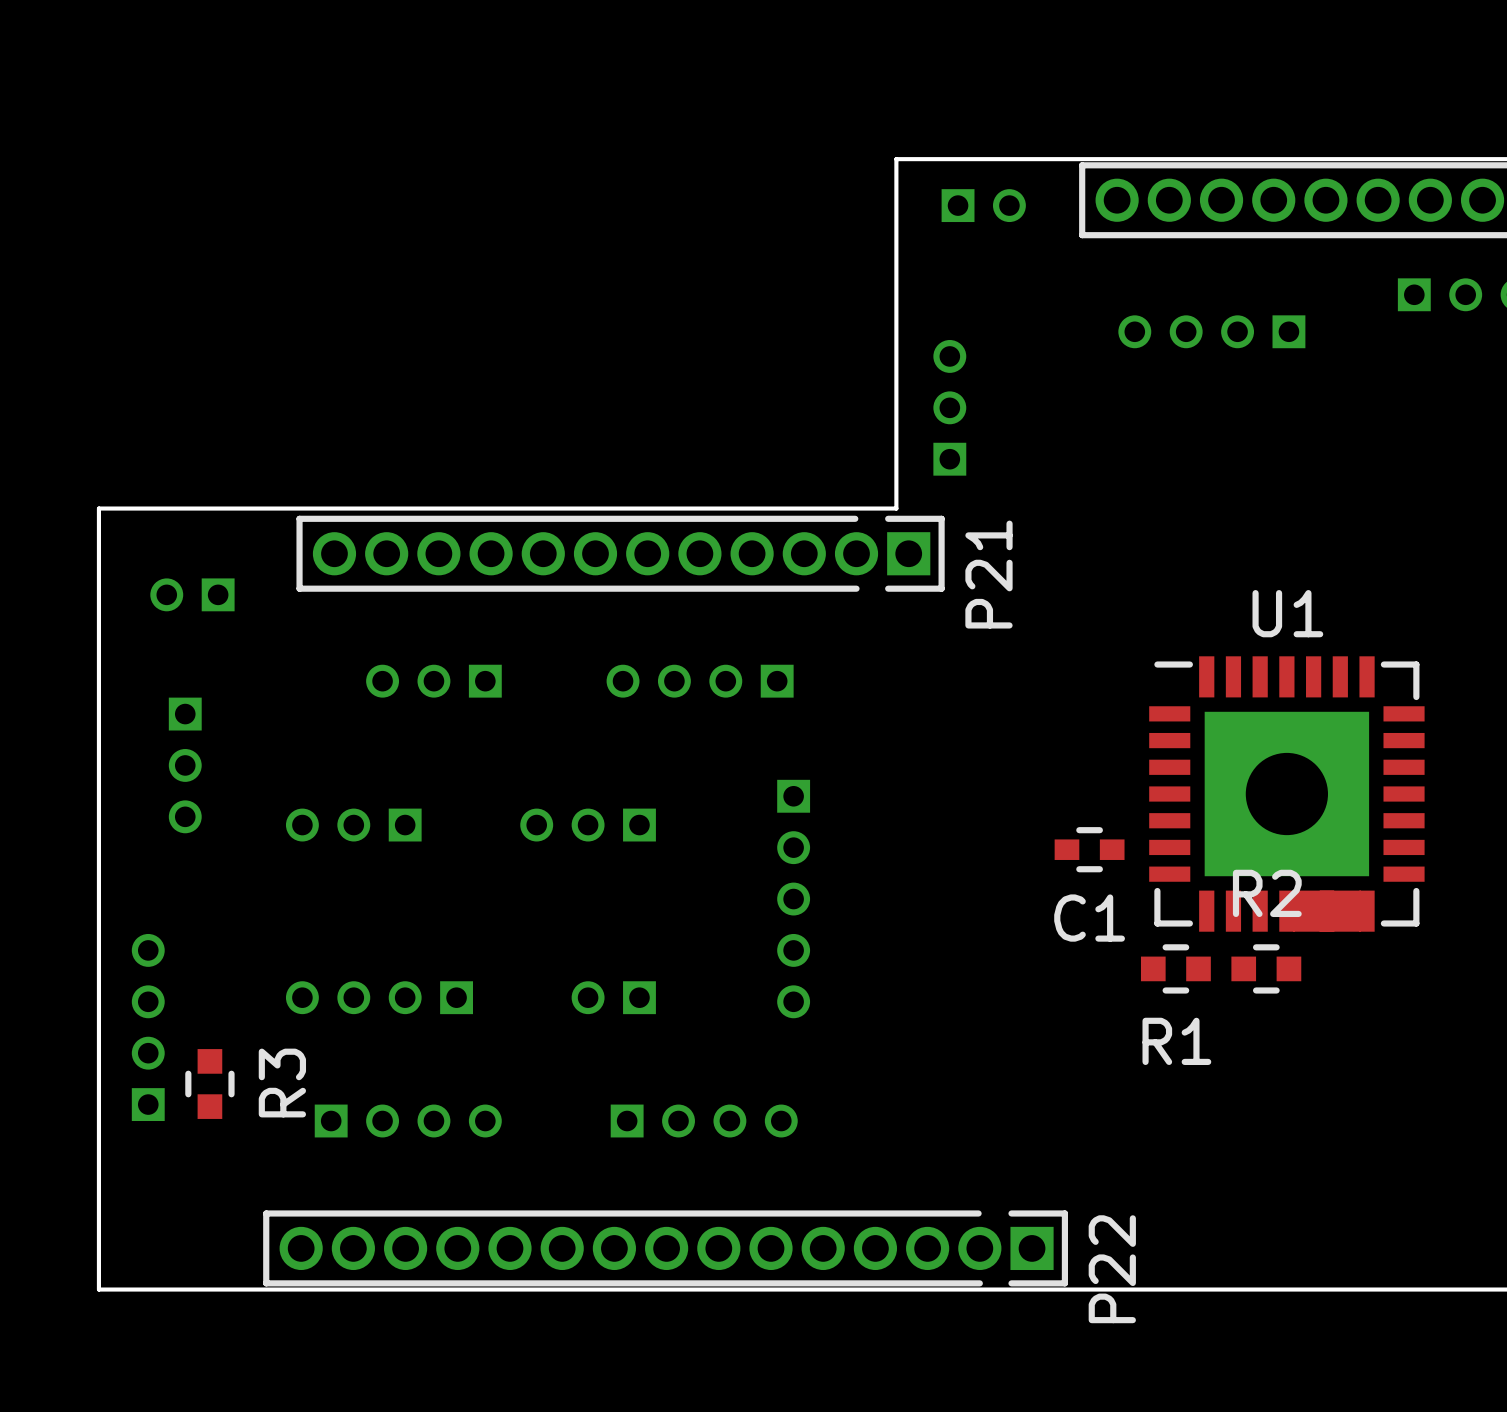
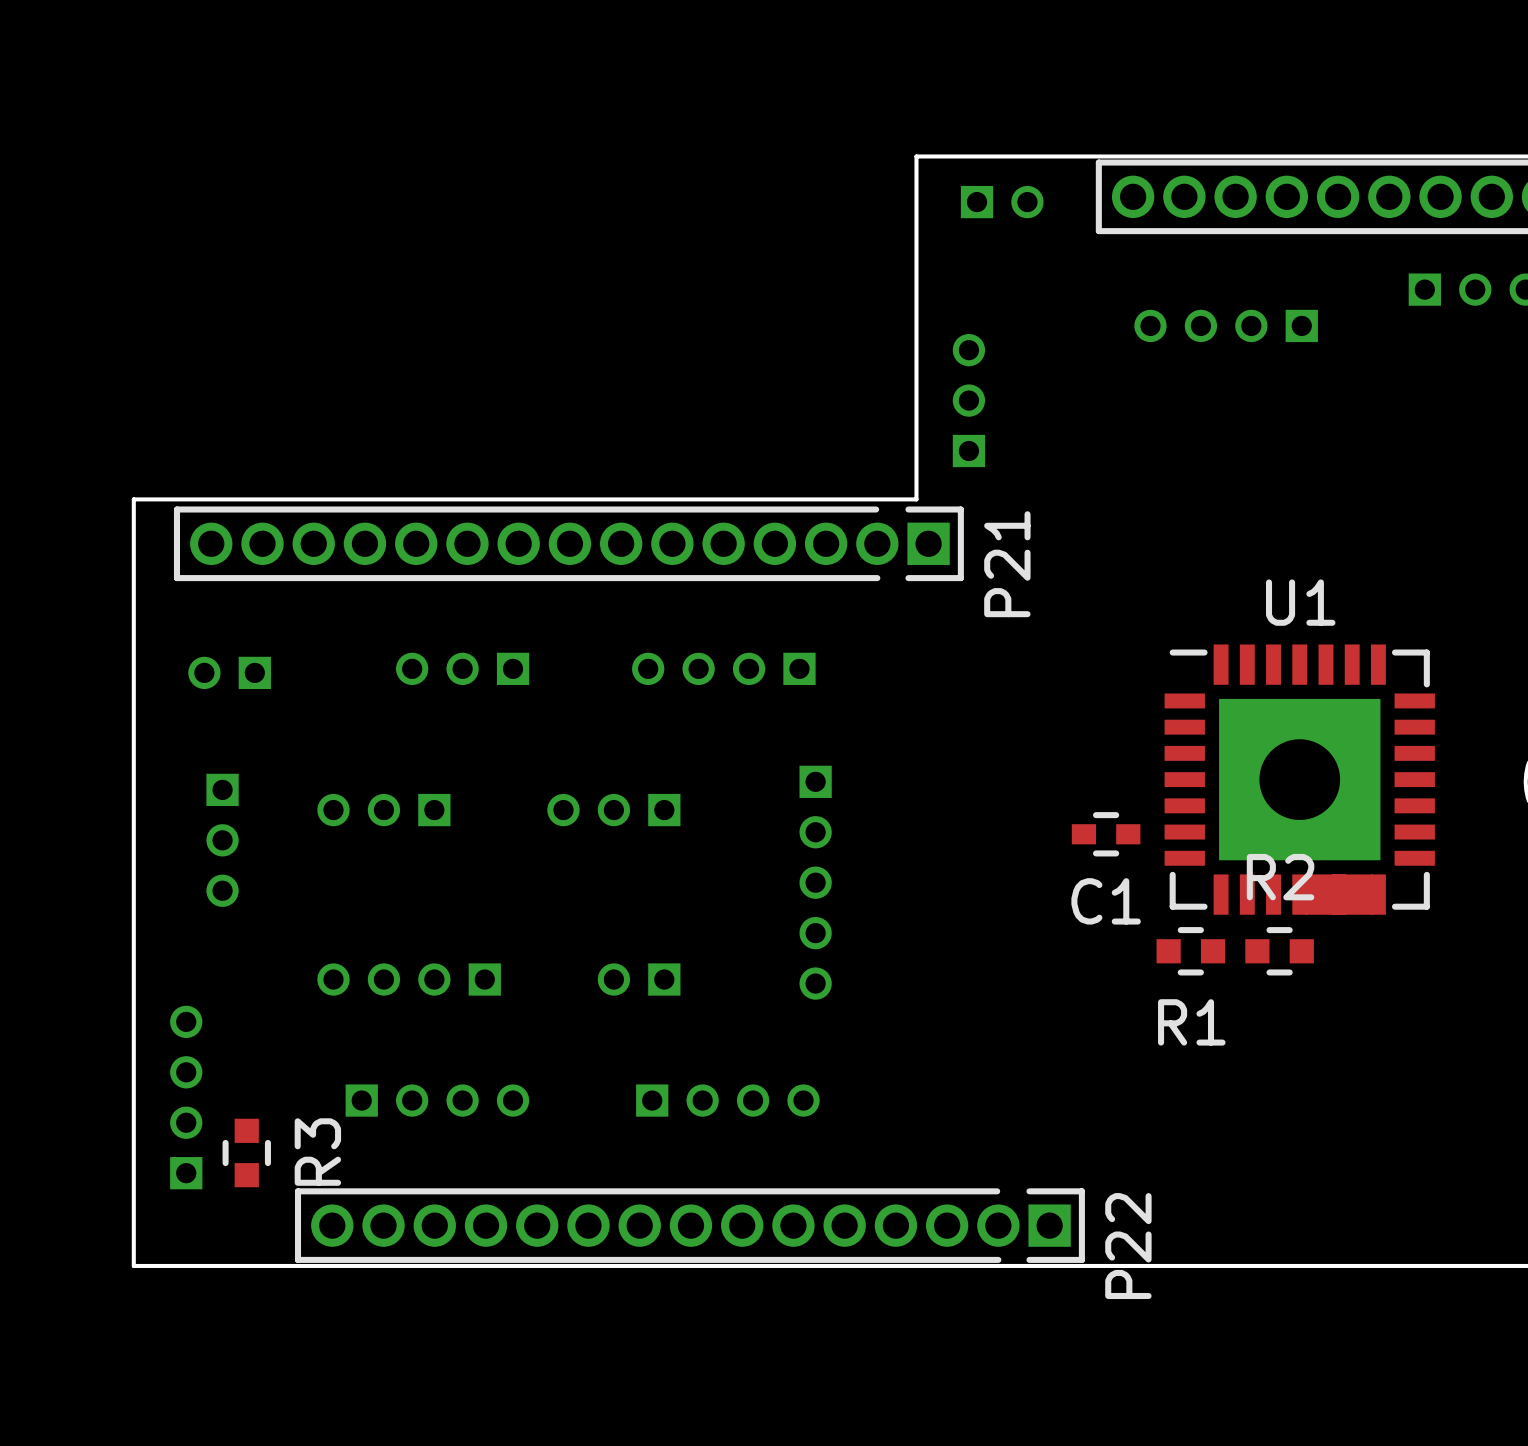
P21 footprint: [296, 515, 945, 592] -> [173, 506, 964, 582]
part position: (192, 594) -> (229, 672)
part position: (185, 765) -> (222, 840)
part position: (148, 1027) -> (186, 1097)
R3 position: (209, 1084) -> (246, 1153)

